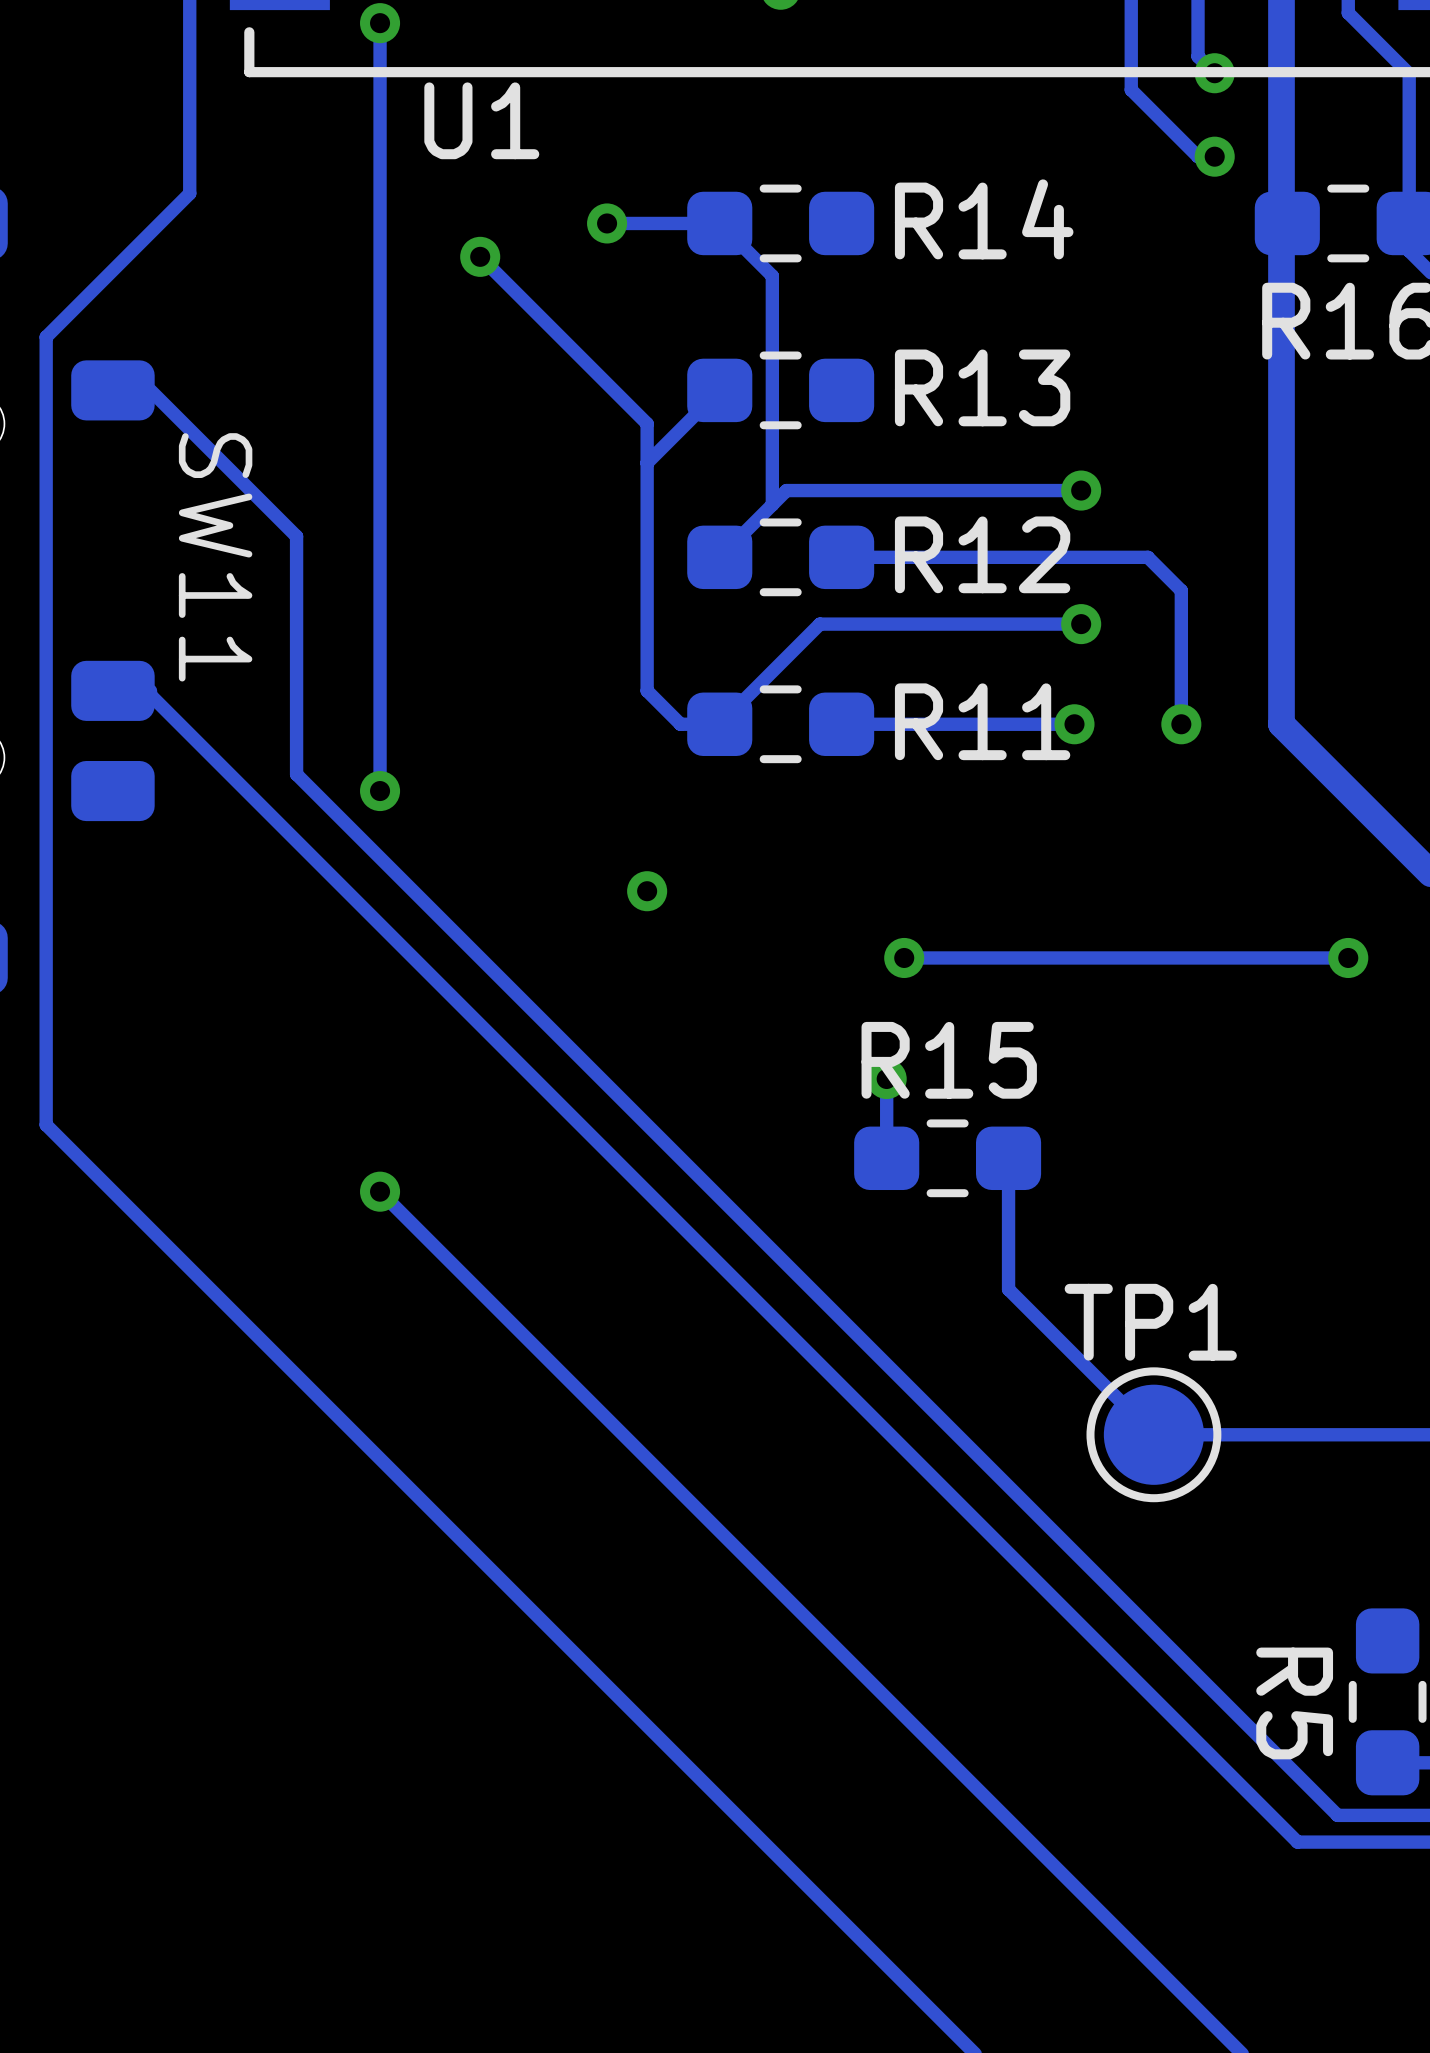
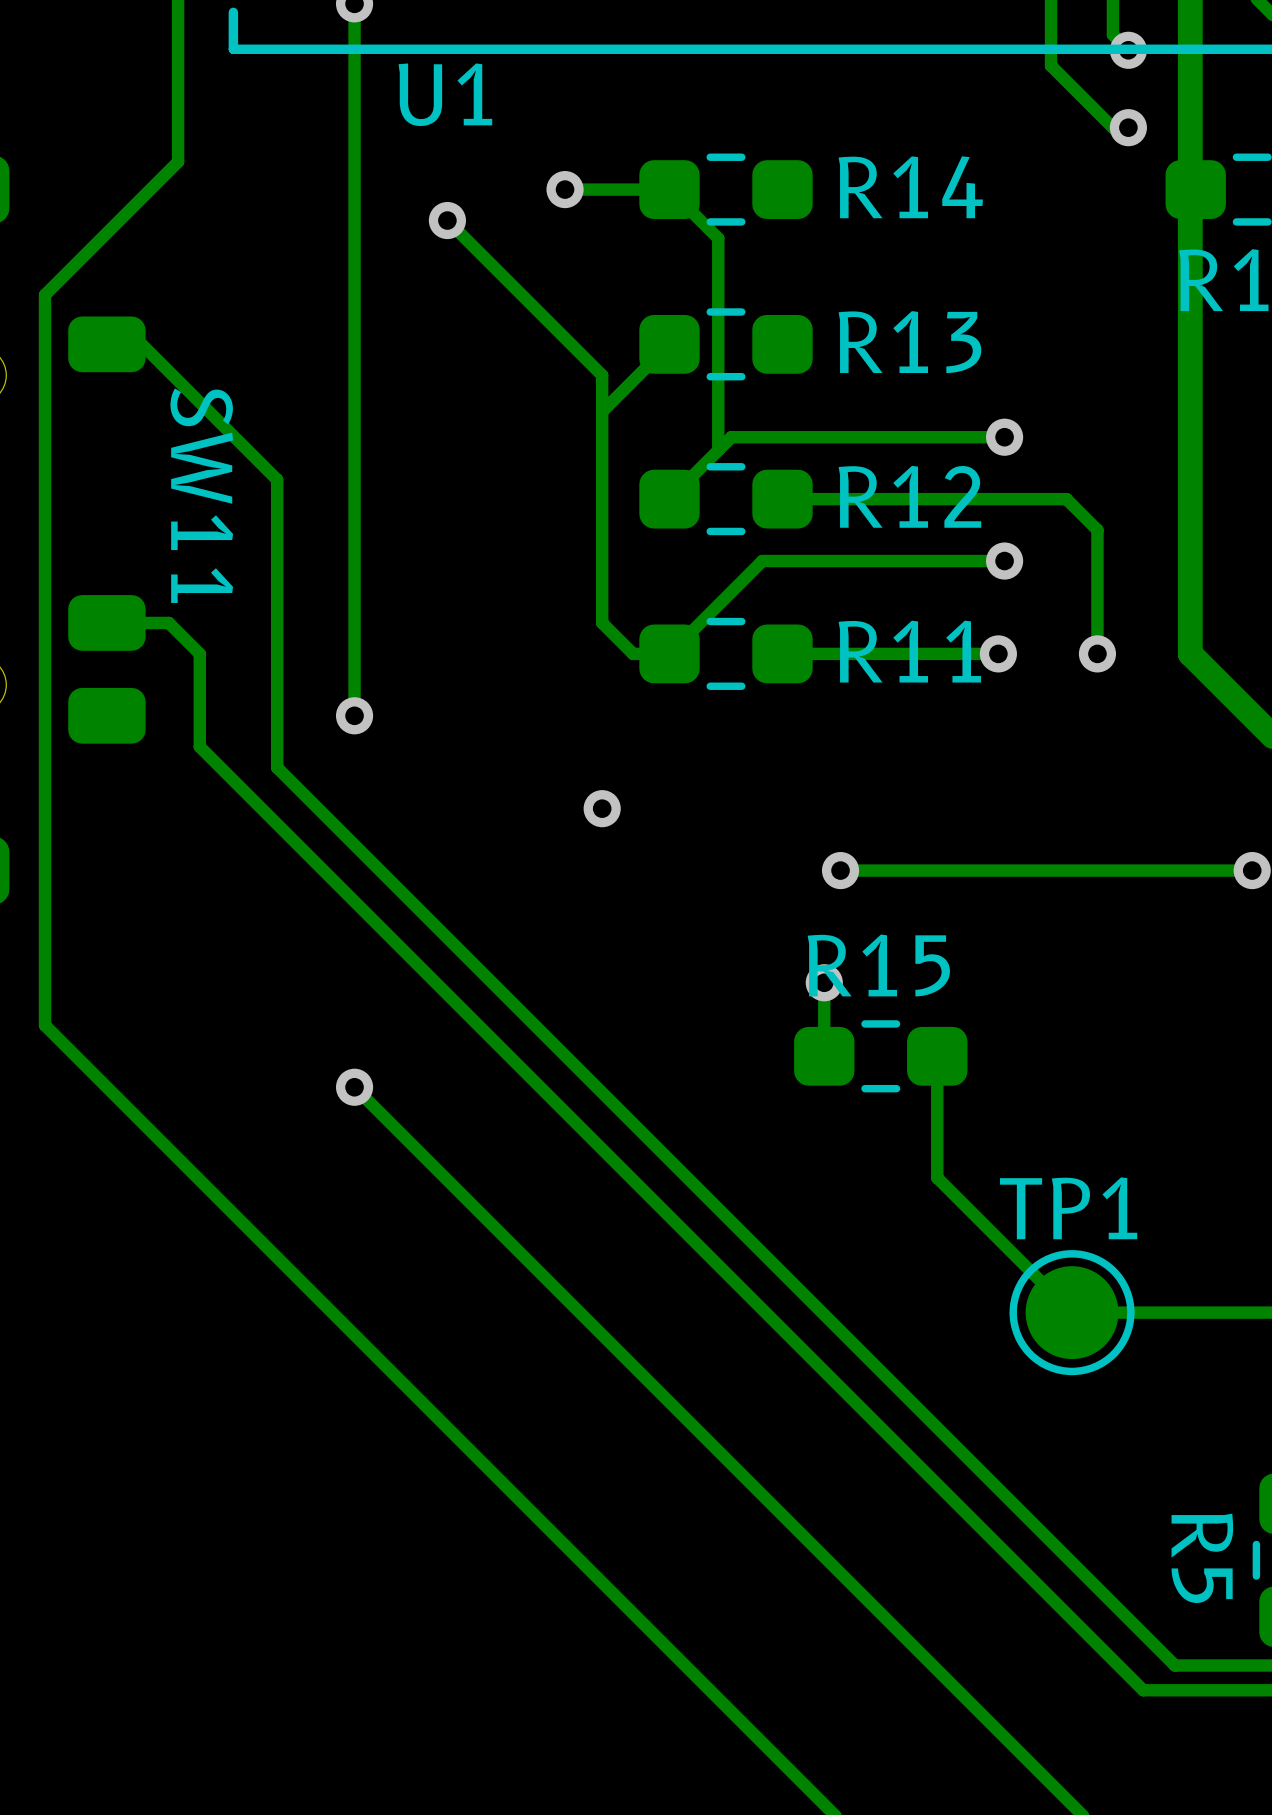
track: (150, 690) (150, 695) (1297, 1842) -> (106, 622) (168, 622) (199, 653) (199, 746) (1143, 1690) (1205, 1690)
track: (296, 774) (1337, 1815) -> (277, 700) (277, 767) (1175, 1665) (1242, 1665)

